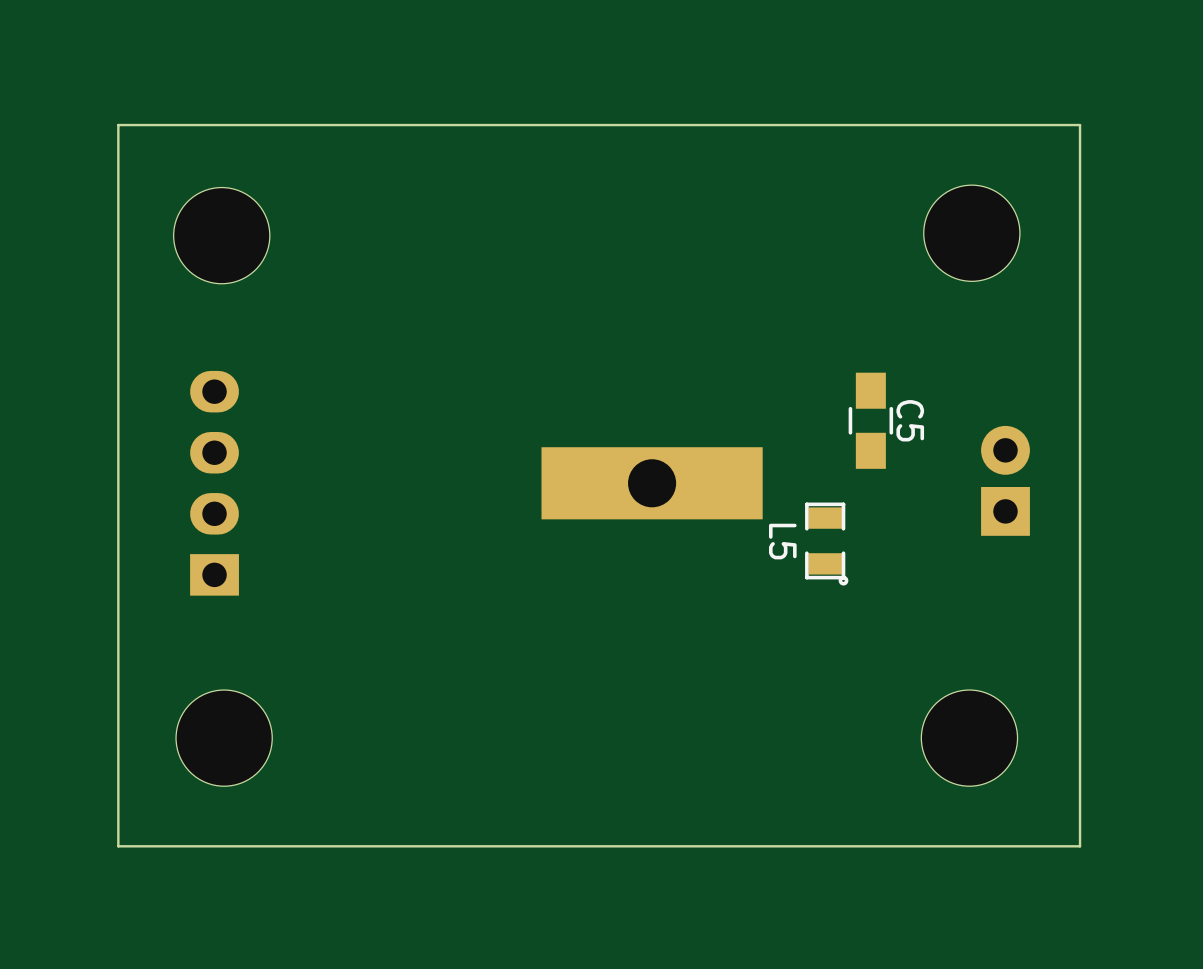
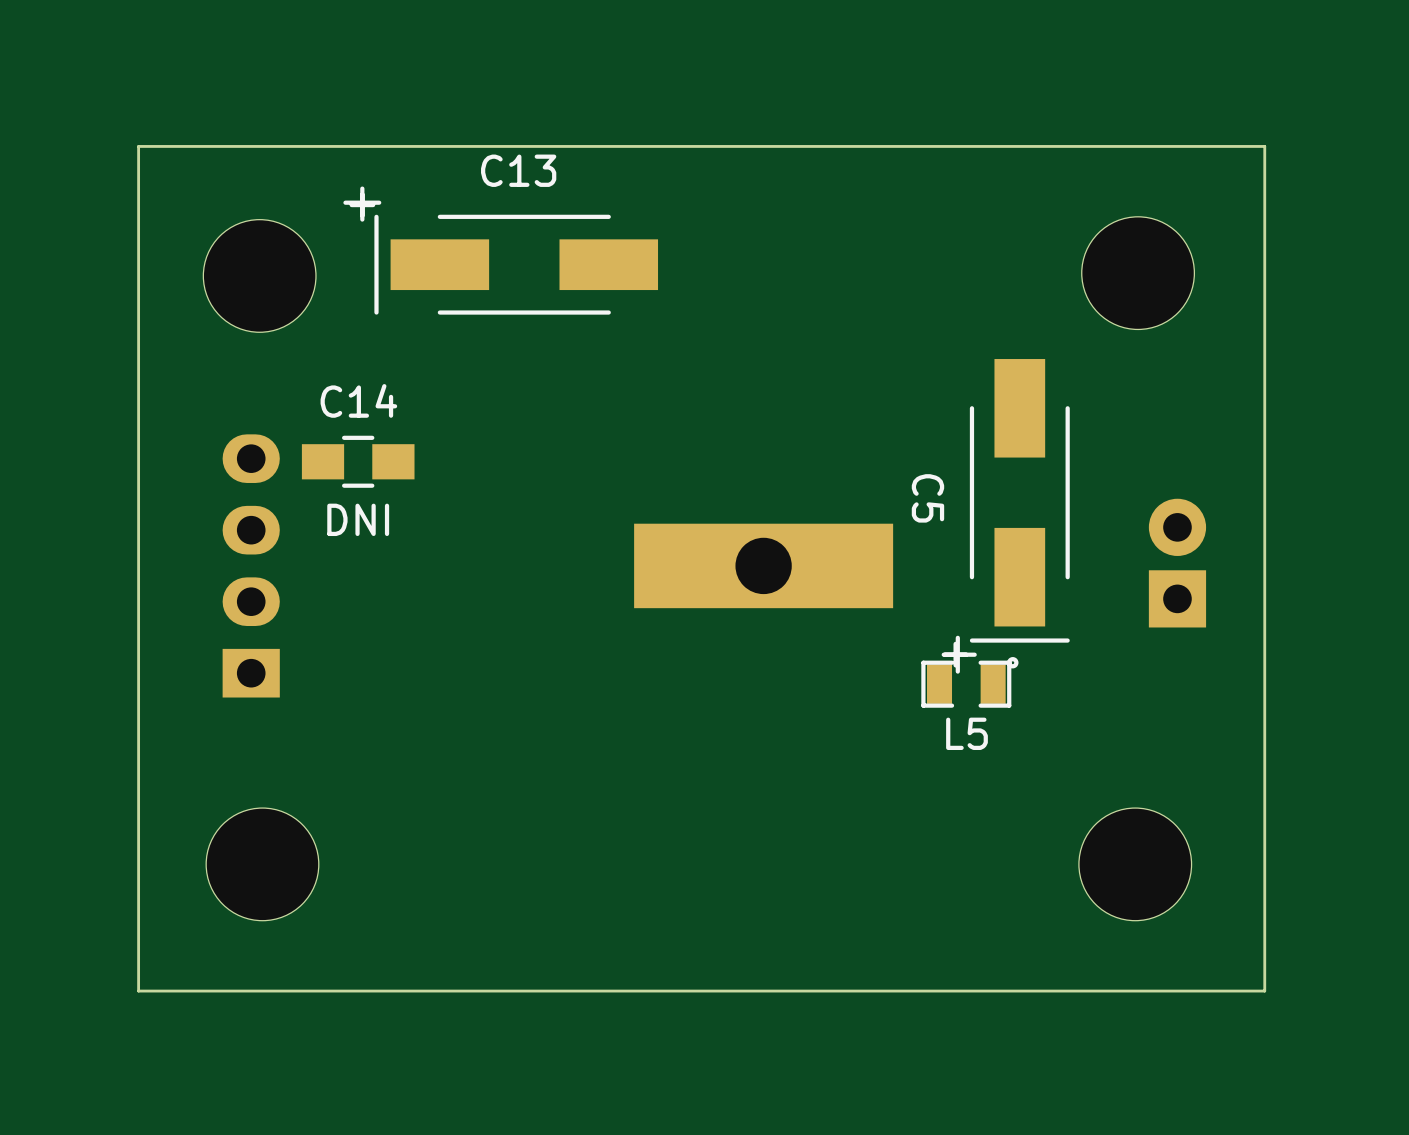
C13: none -> (500, 250)
C5 footprint: [848, 372, 894, 469] -> [941, 359, 1070, 674]
C14: none -> DNI (358, 461)
C5 name position: C5 (910, 420) -> C5 (927, 498)
L5 rotation: 0° (826, 544) -> 90° counterclockwise (969, 682)

